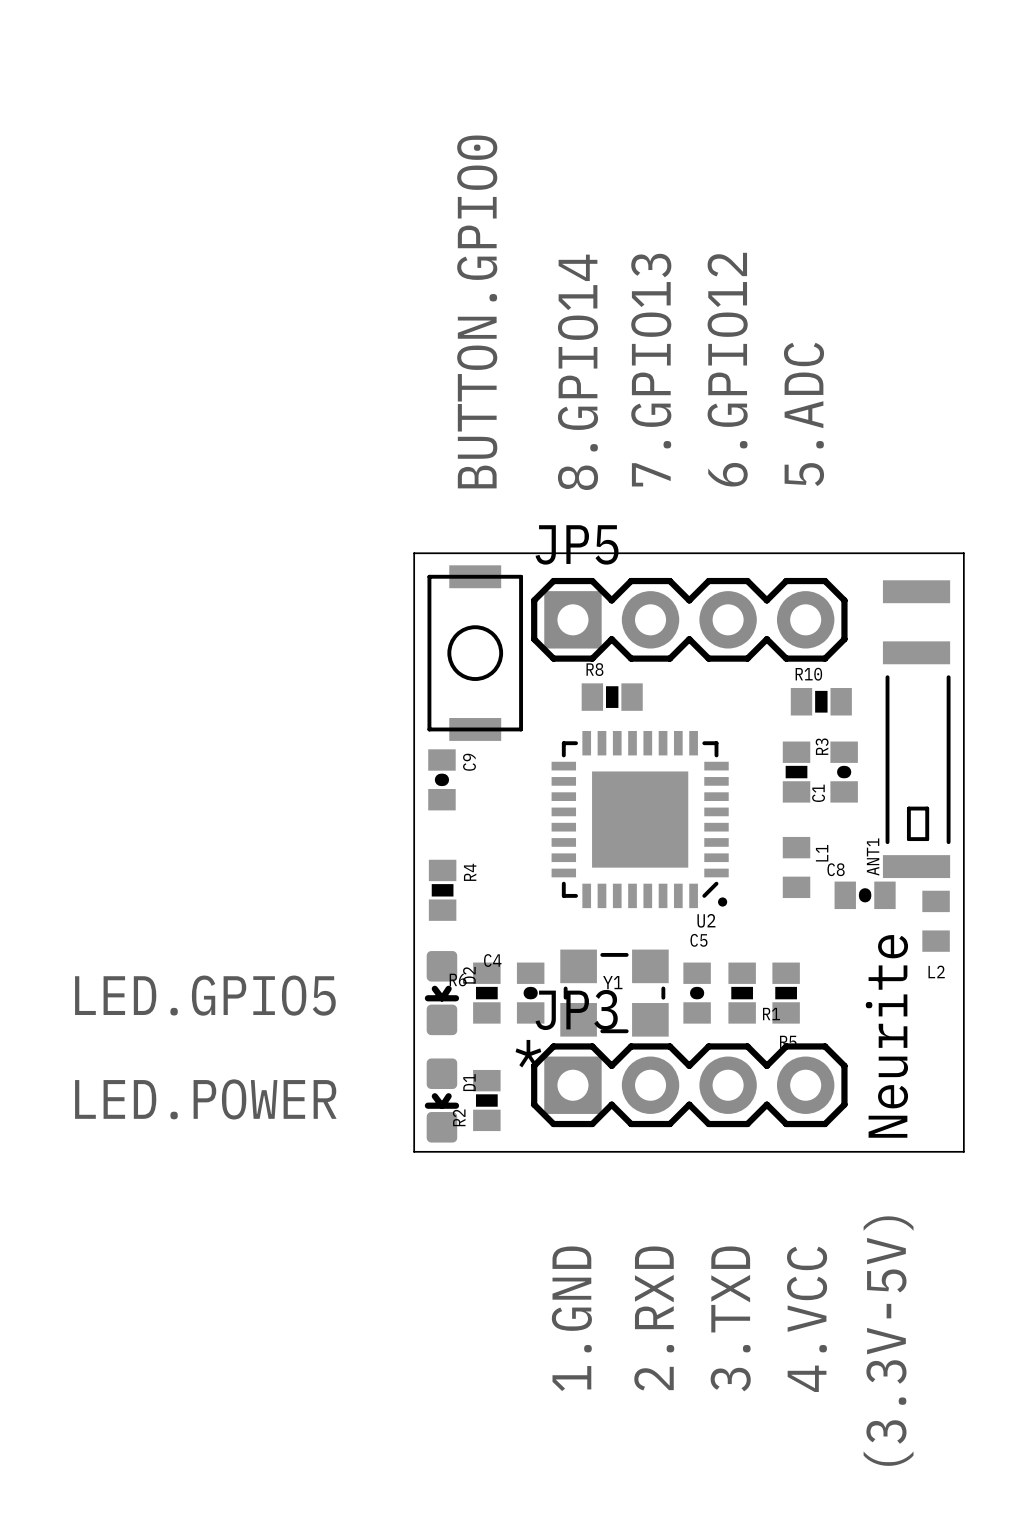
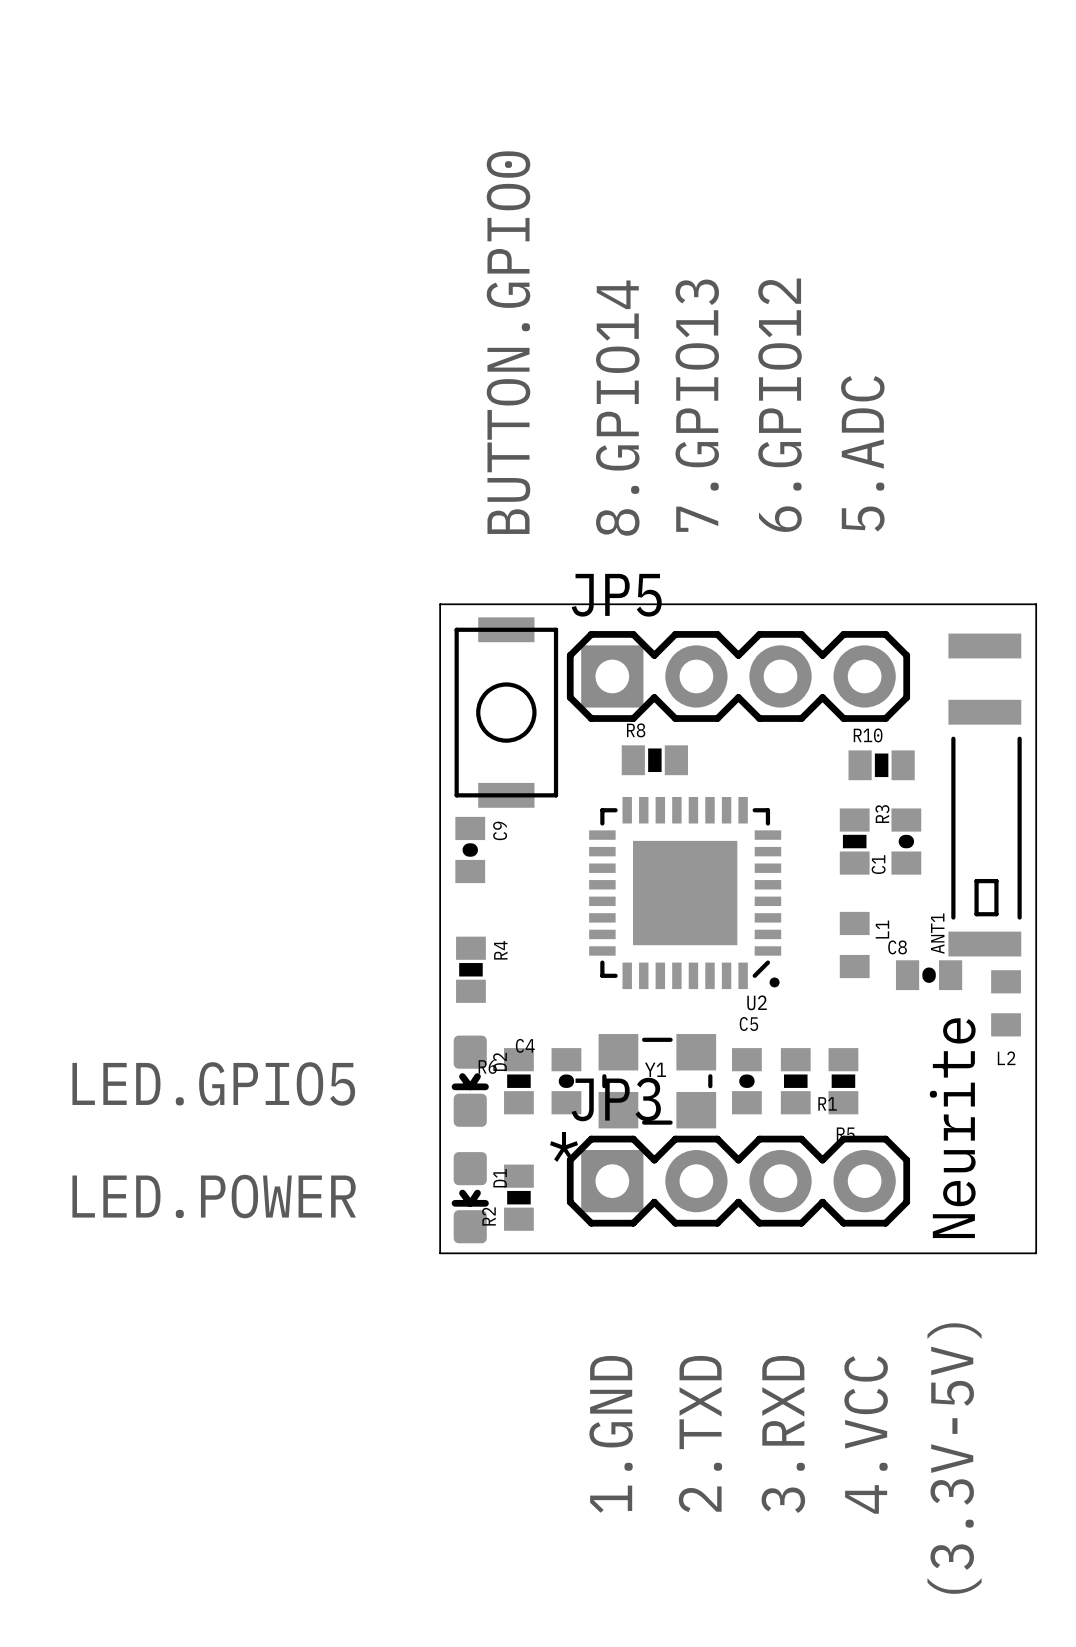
text: 2.RXD (654, 1318) -> 2.TXD (700, 1434)
text: 3.TXD (730, 1318) -> 3.RXD (783, 1434)

